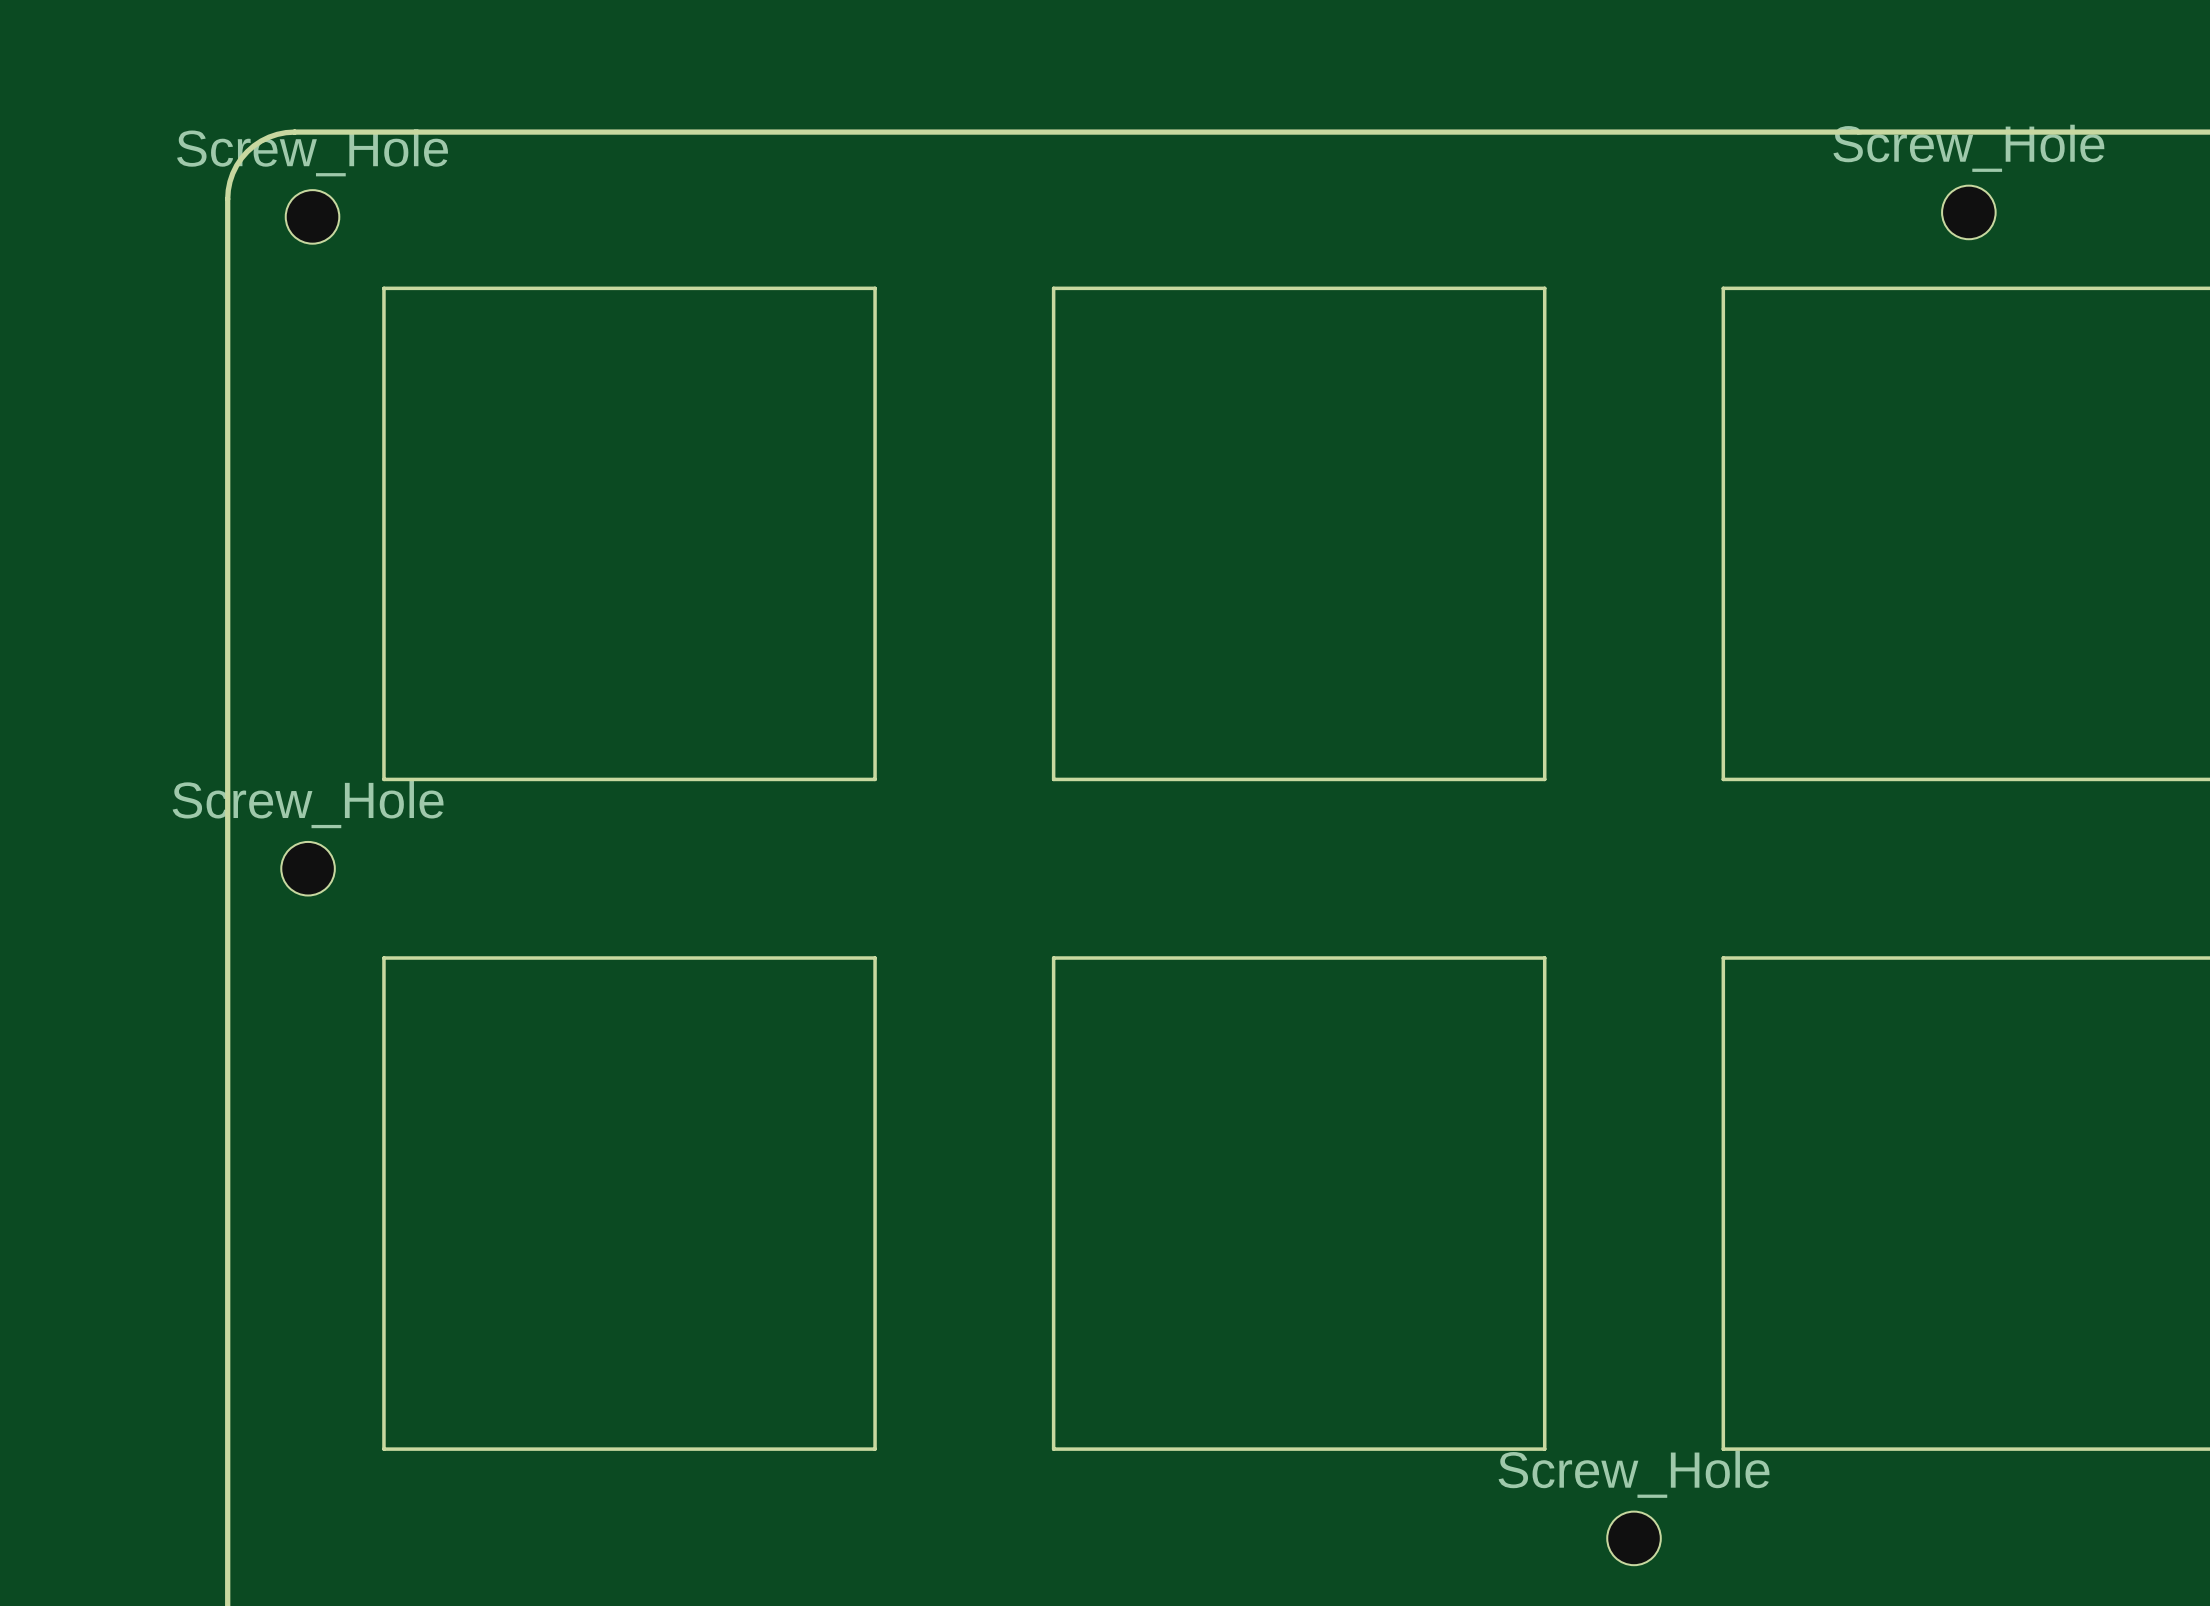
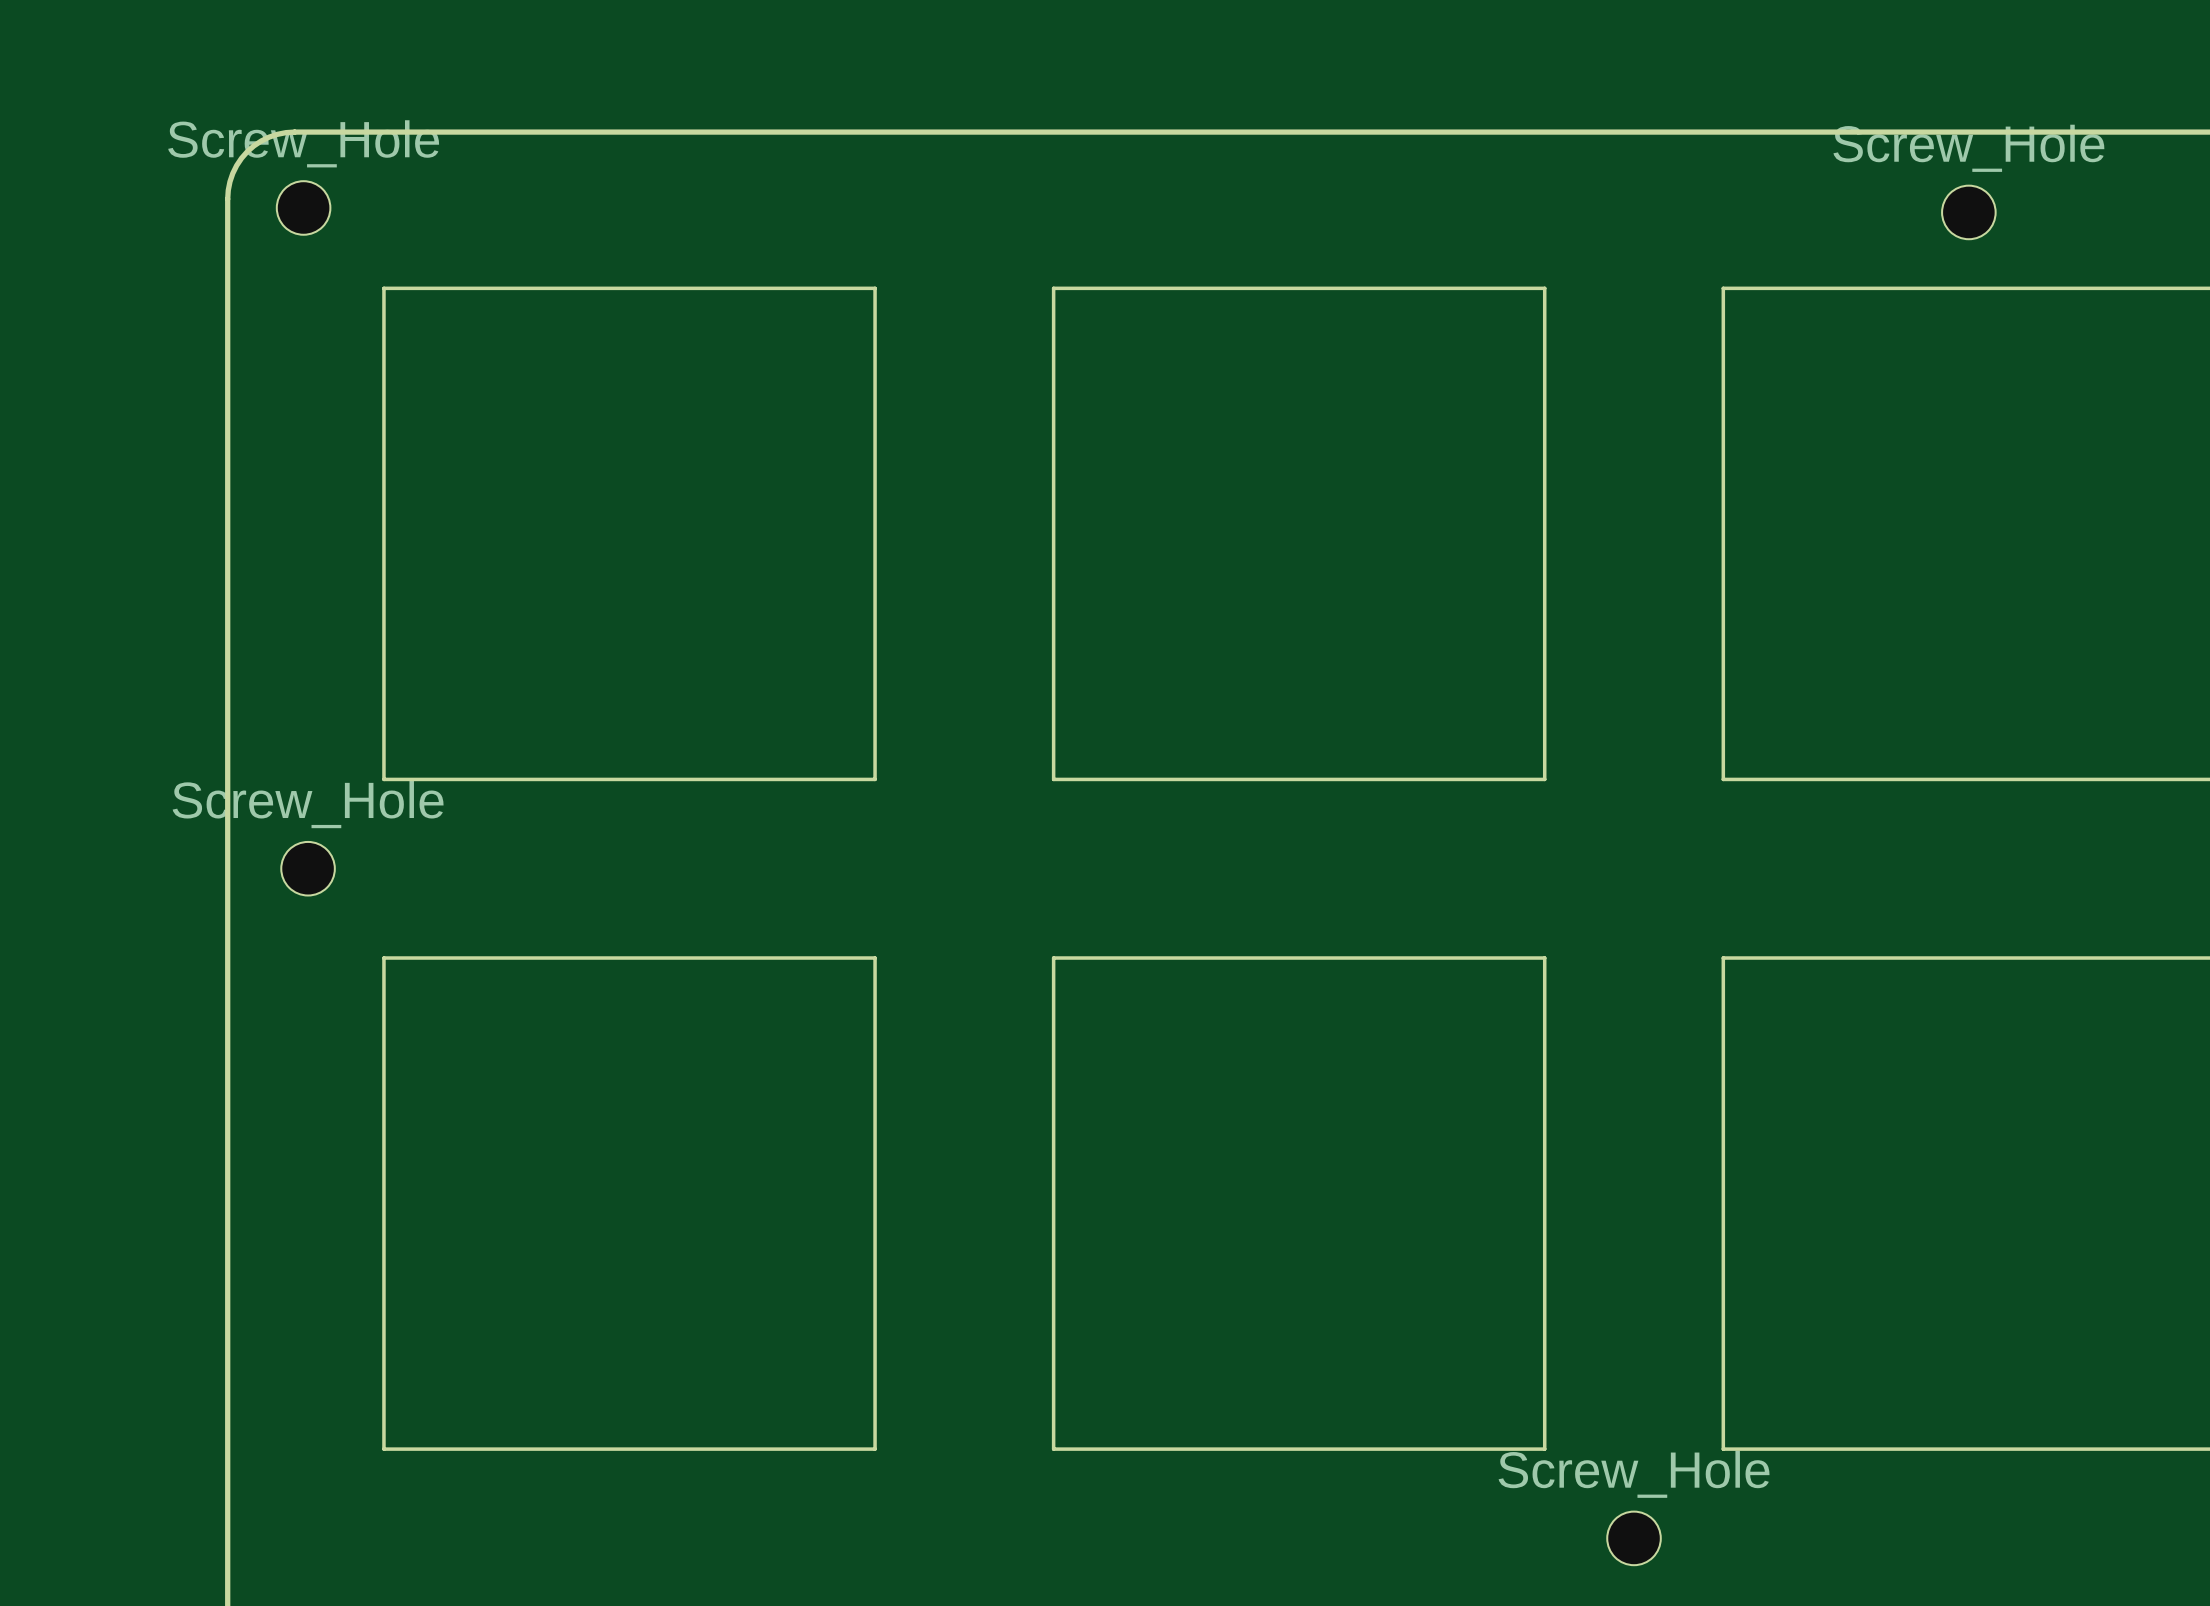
part position: (312, 216) -> (303, 207)

